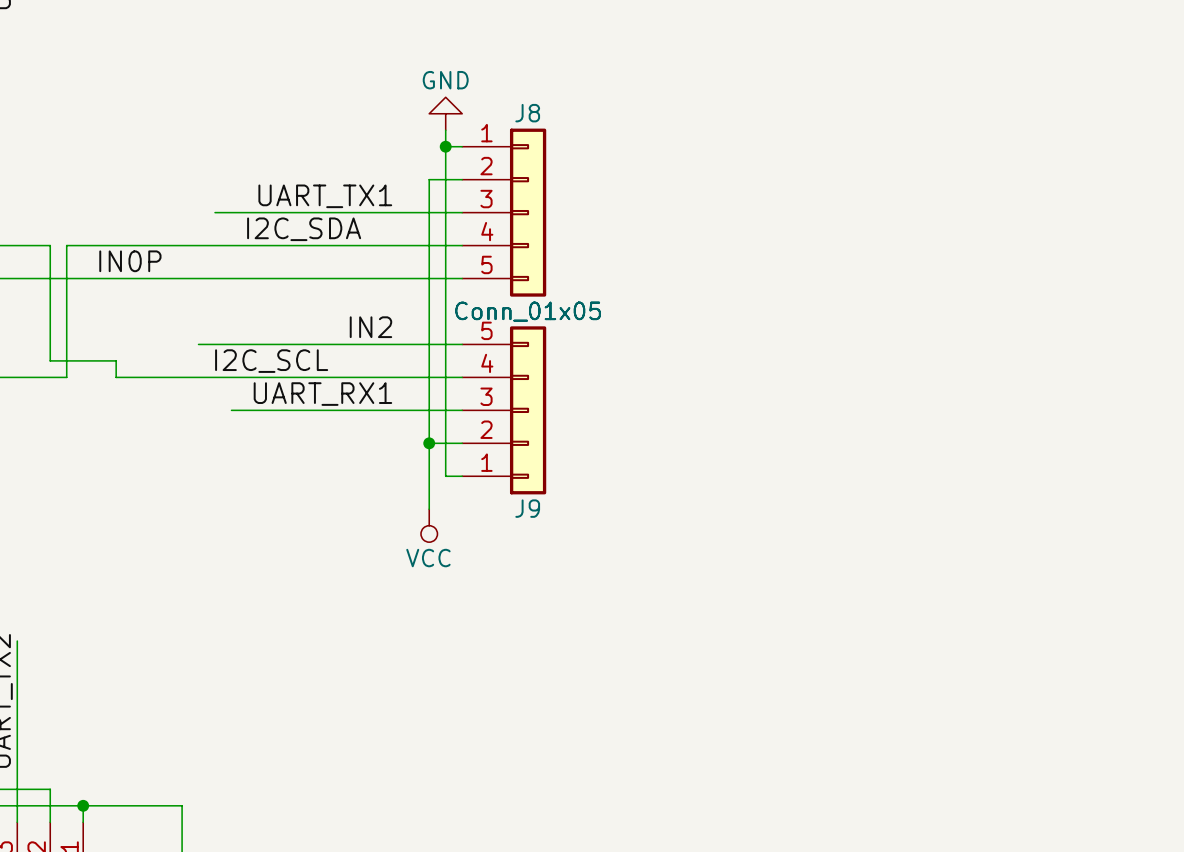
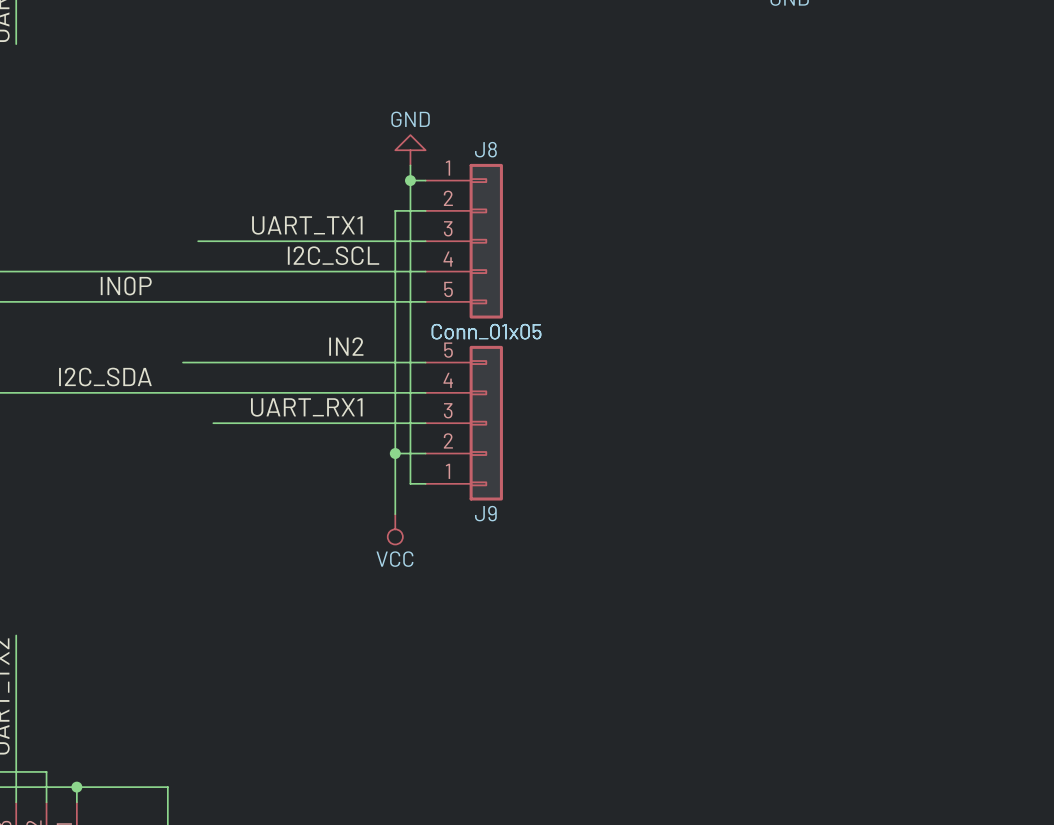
label: I2C_SDA (304, 229) -> none
wire: (50, 245) (50, 360) (116, 360) (116, 377) -> (61, 392) (107, 392)
wire: (66, 245) (66, 377) -> (61, 271) (46, 271)
label: none -> I2C_SDA (105, 377)
label position: I2C_SCL (271, 361) -> I2C_SCL (333, 255)

